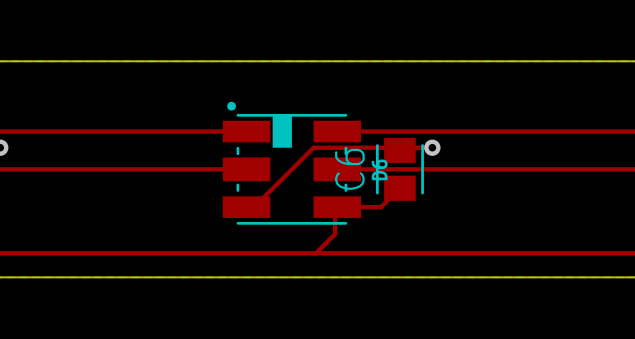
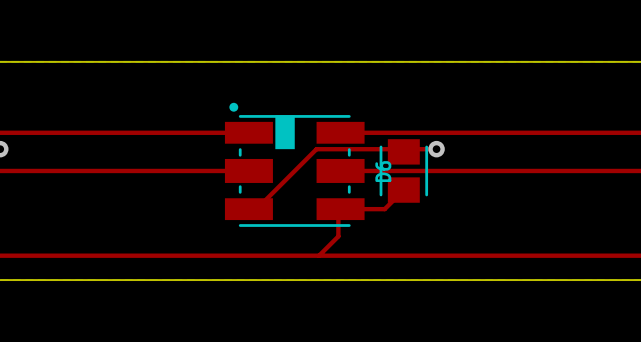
C6 name: C6 (349, 169) -> none

